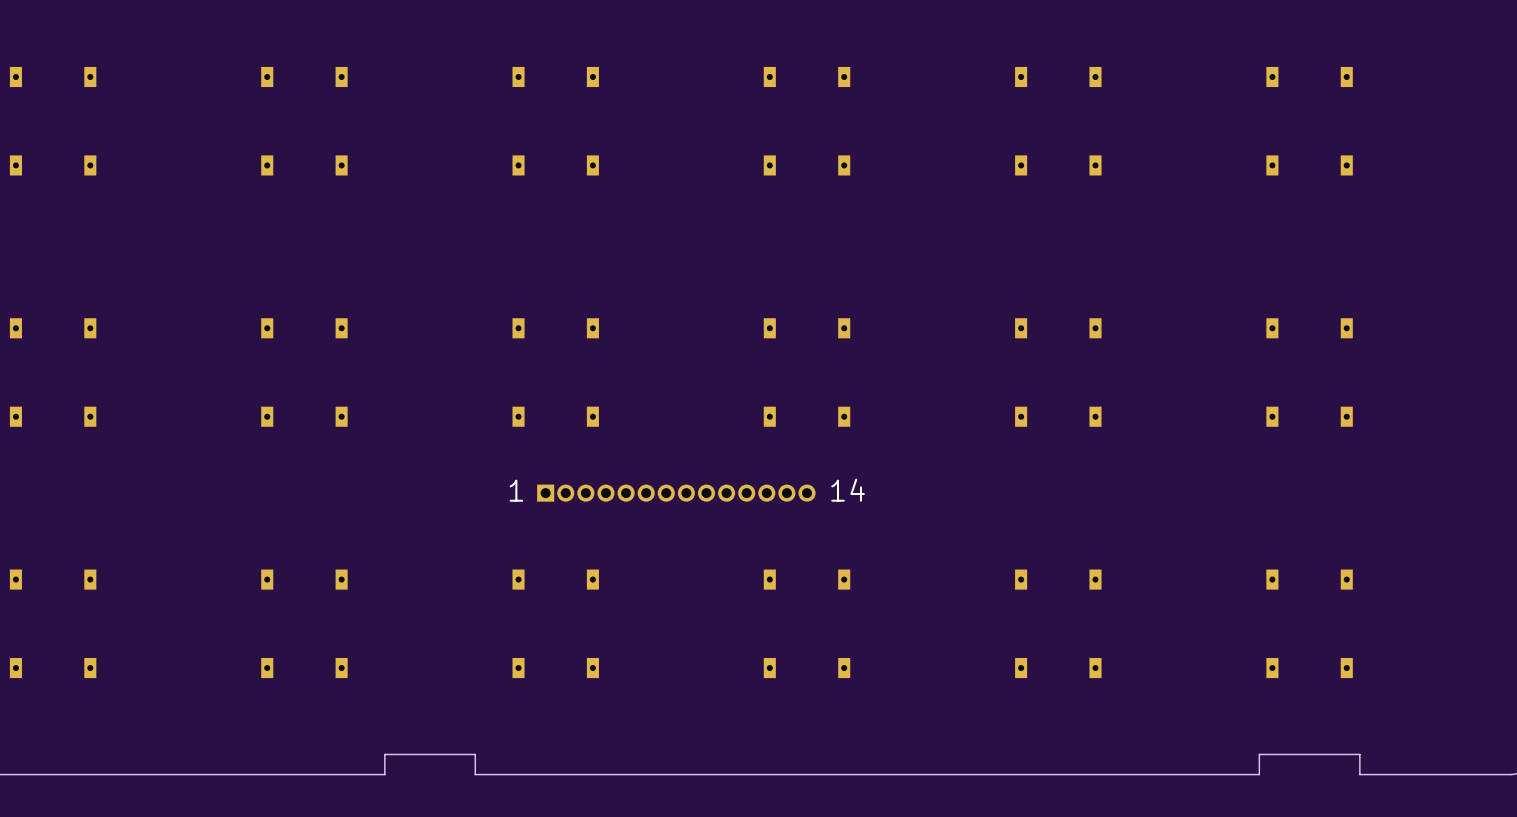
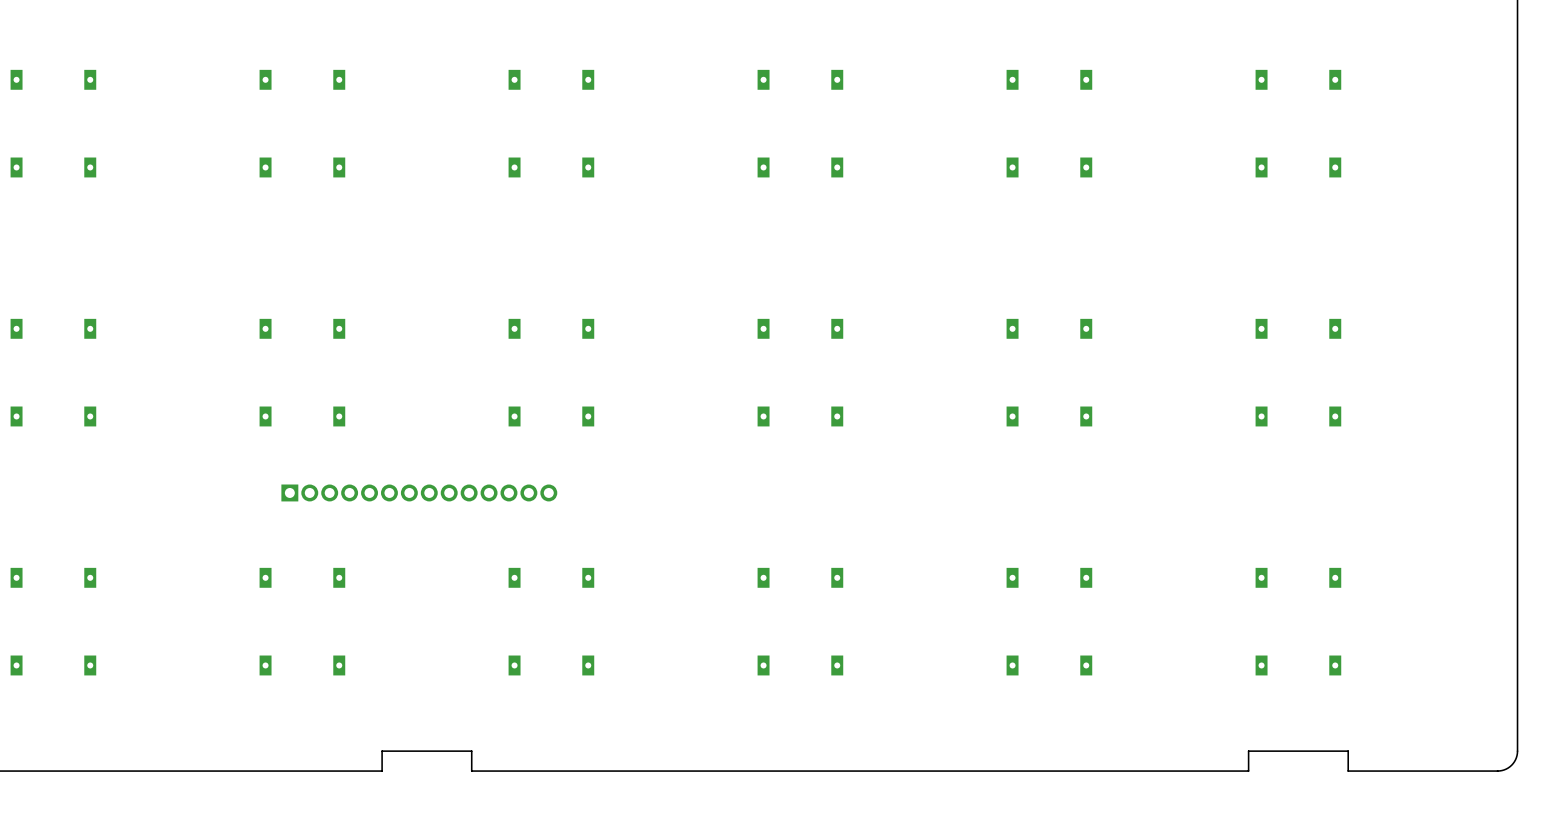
text: 1 (516, 490) -> none
text: 14 (848, 490) -> none
part position: (676, 493) -> (419, 492)

